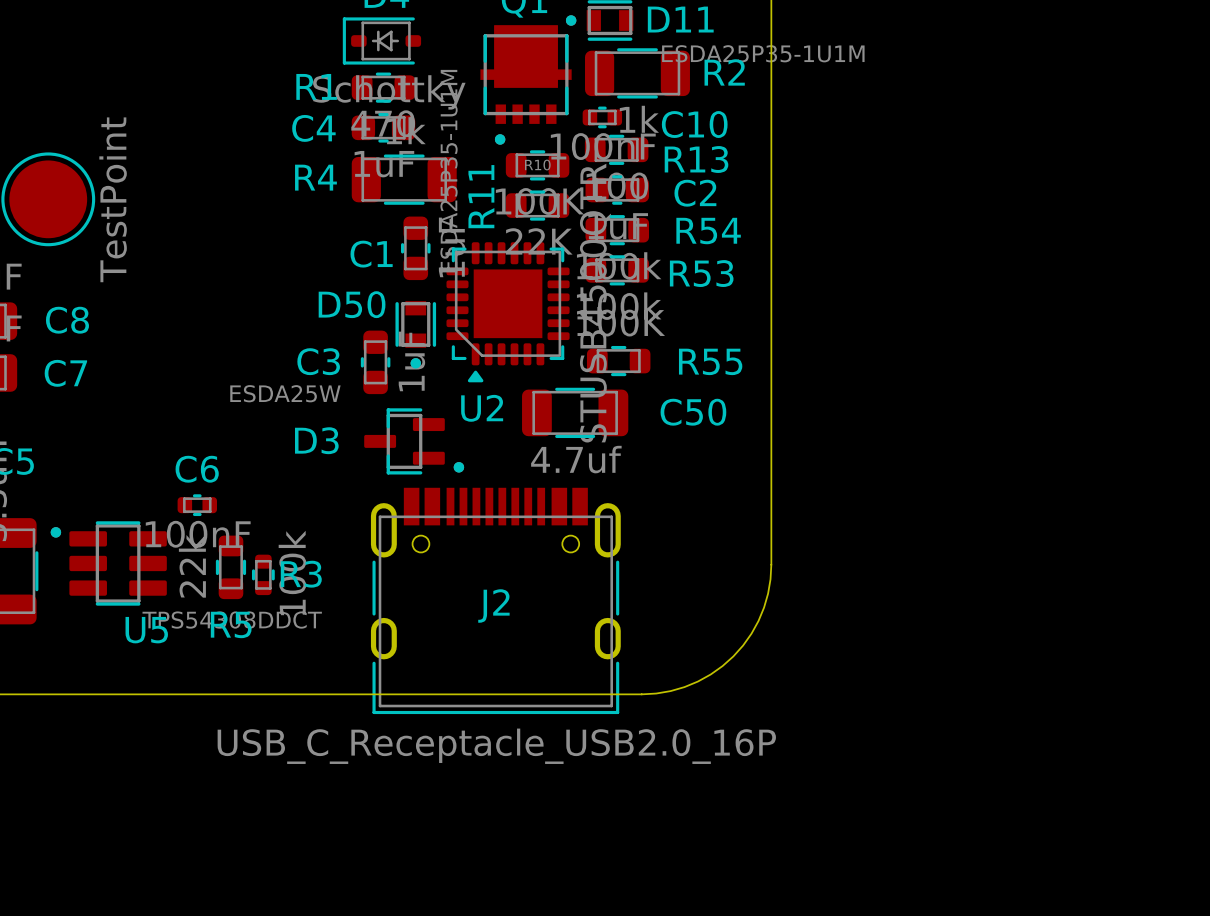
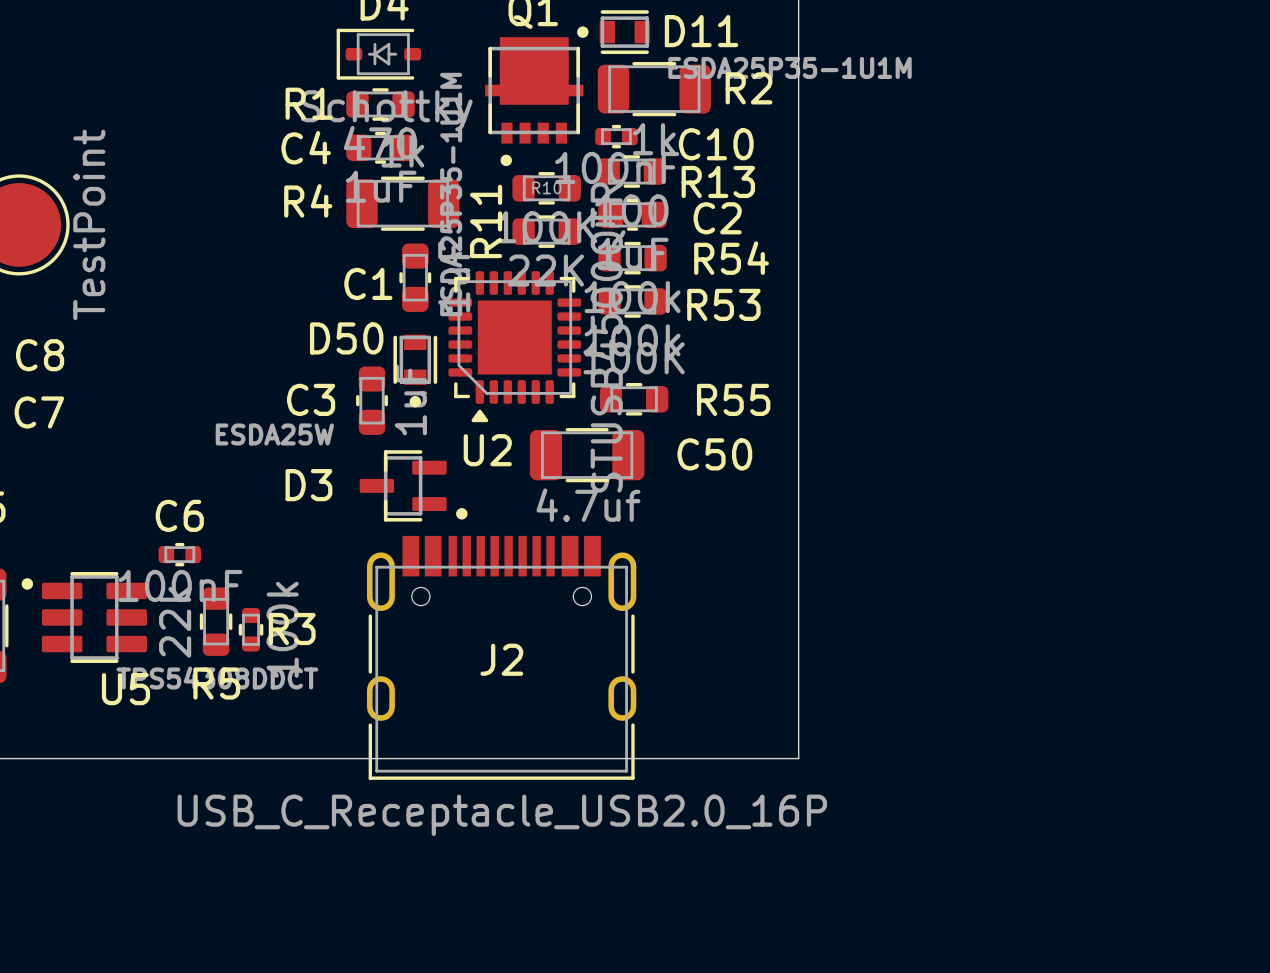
board edge: (771, 564) (770, 579) (764, 607) (751, 633) (733, 656) (710, 674) (684, 687) (656, 693) (641, 694) -> (798, 618) (798, 758) (658, 758)

